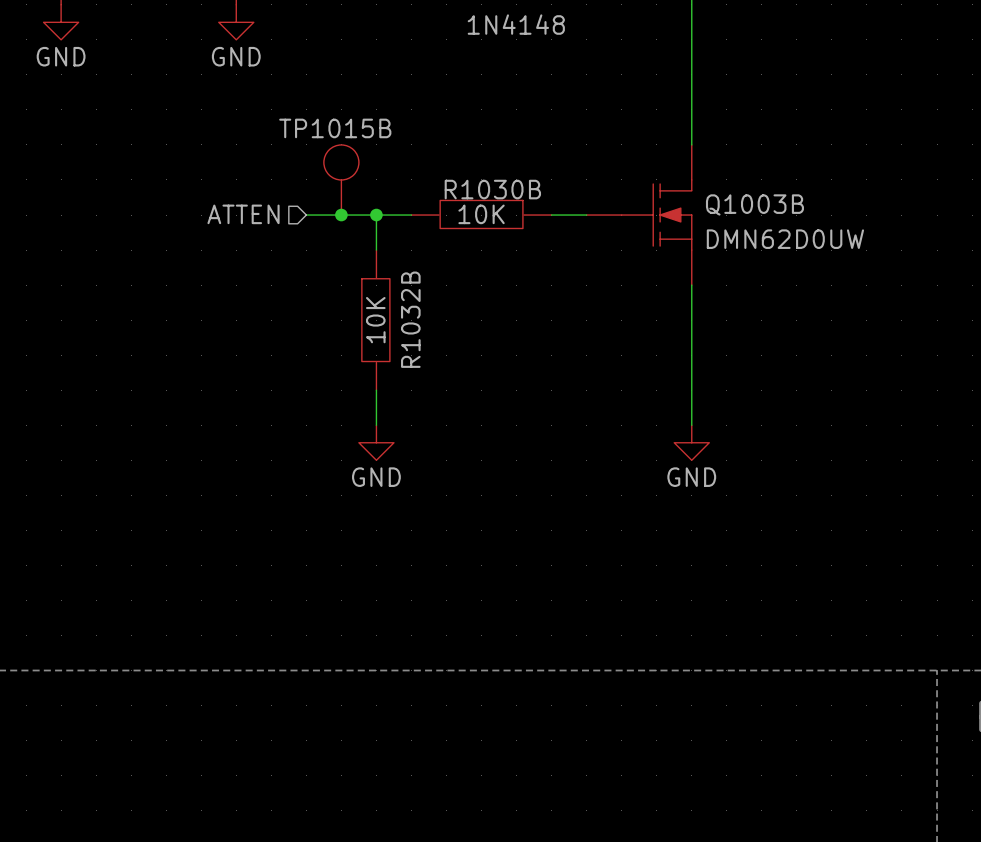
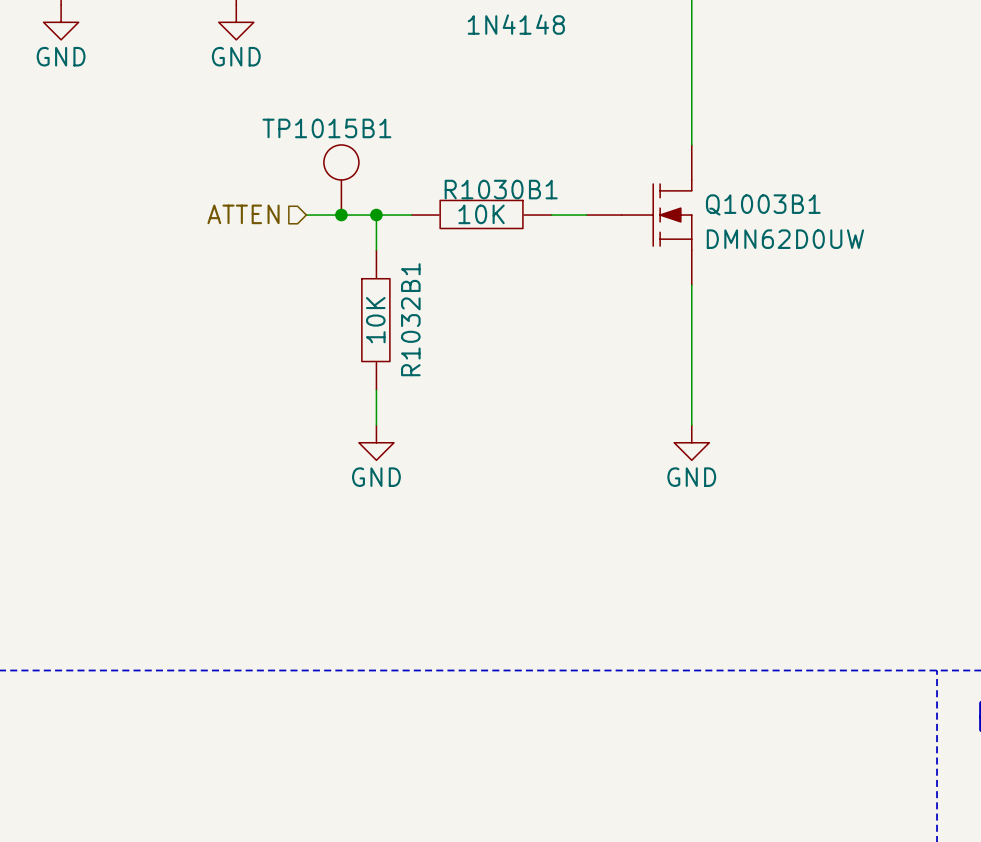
TP1015B name: TP1015B (335, 128) -> TP1015B1 (326, 128)
R1030B name: R1030B (492, 189) -> R1030B1 (501, 189)
Q1003B name: Q1003B (754, 204) -> Q1003B1 (763, 204)
R1032B name: R1032B (410, 319) -> R1032B1 (410, 319)

